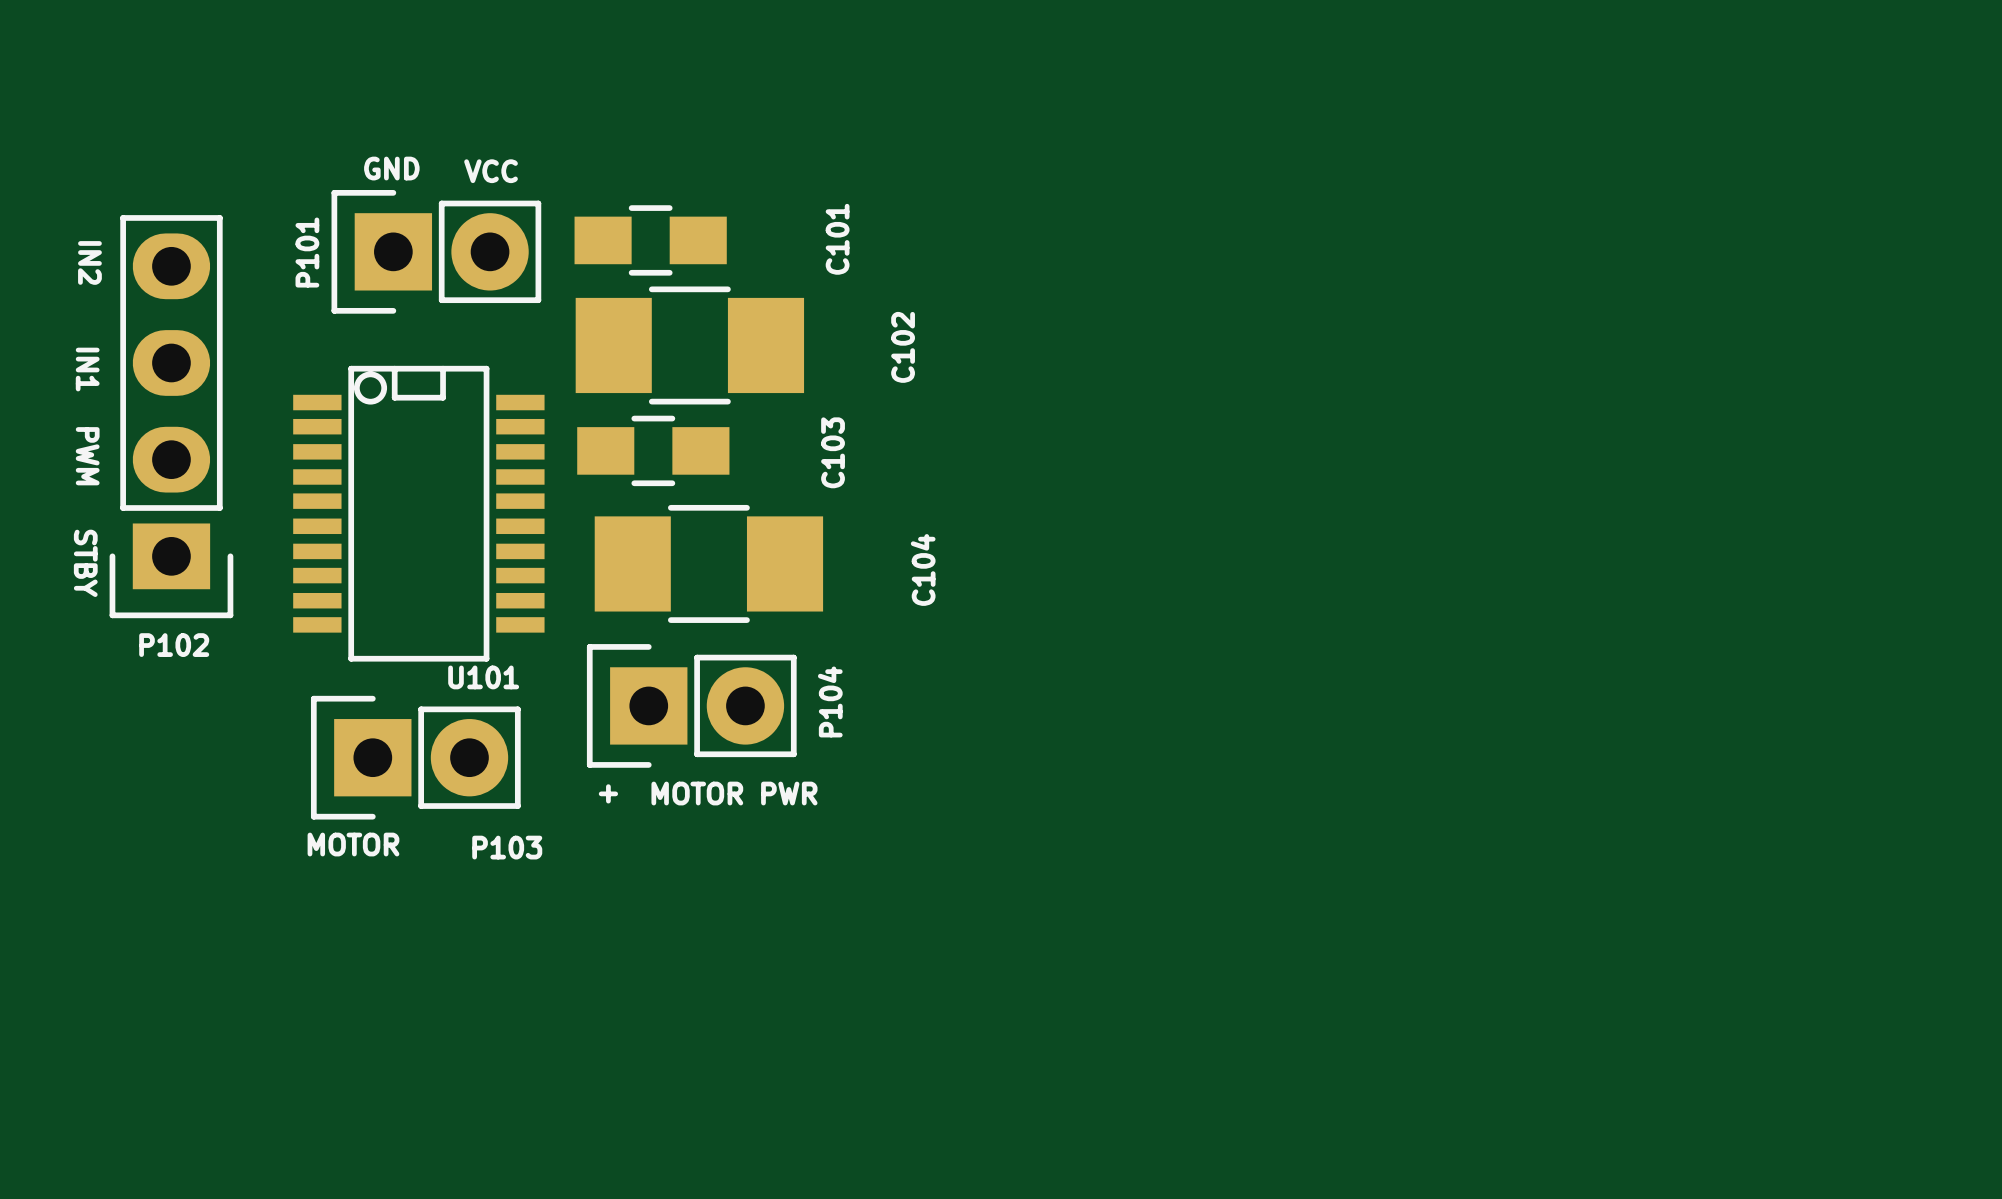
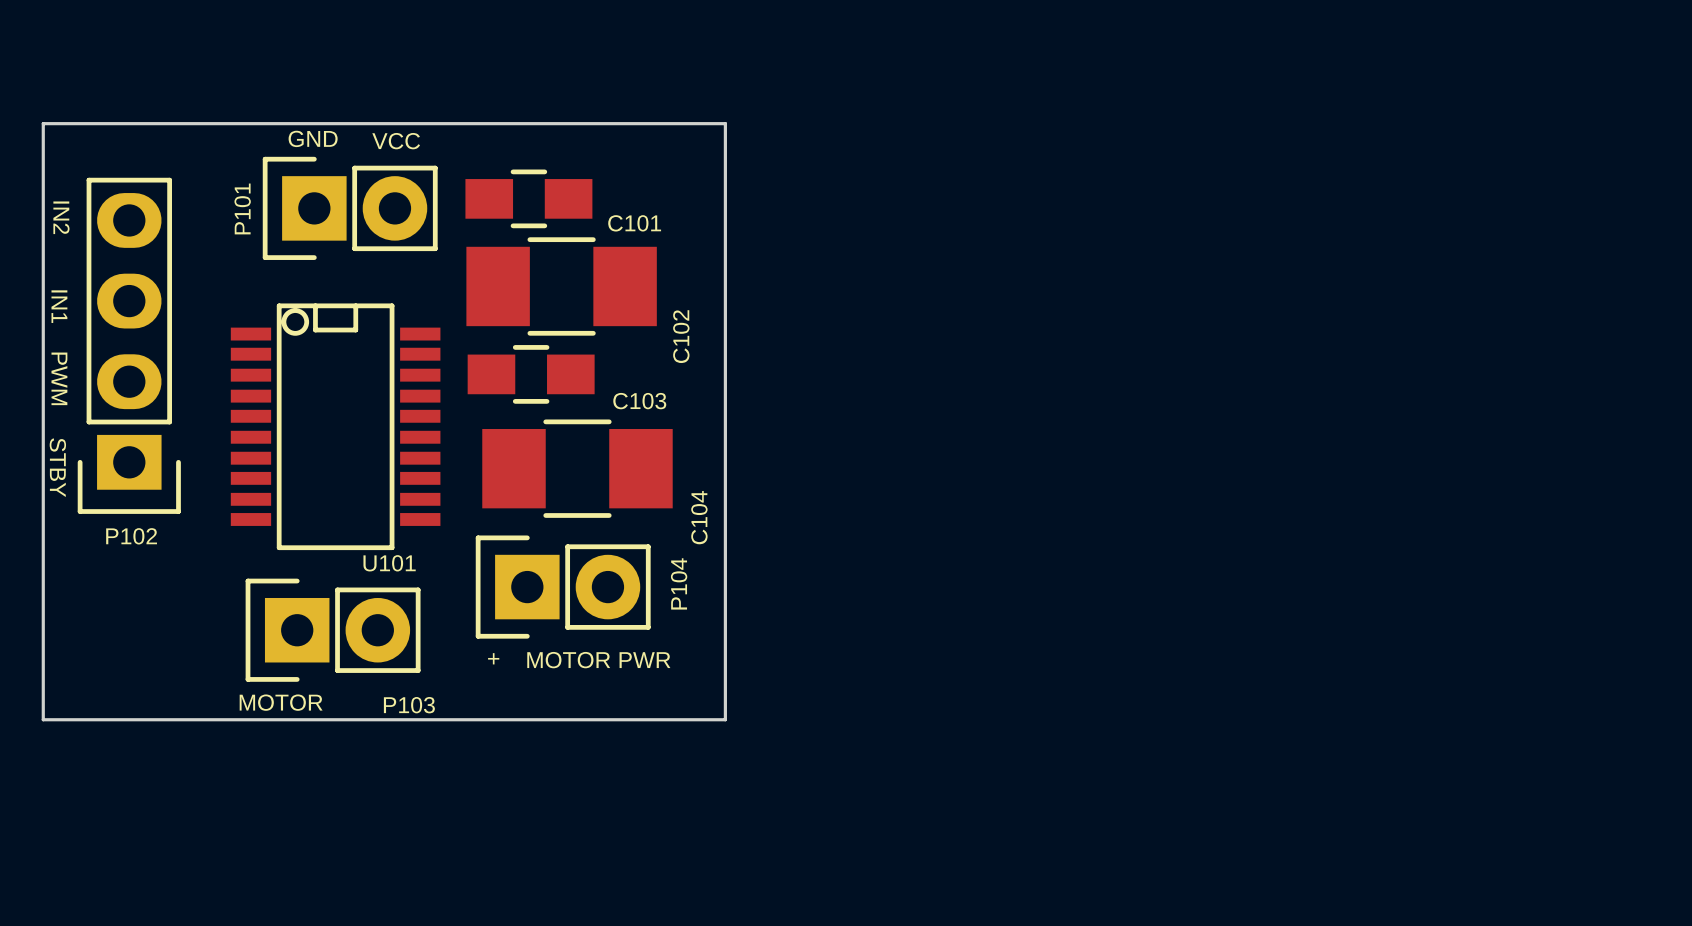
board edge: none -> (43, 123) (725, 123) (725, 719) (43, 719) (43, 123)
C101 name rotation: 0° (837, 239) -> 90° clockwise (634, 223)
C102 name position: C102 (903, 347) -> C102 (681, 336)
C103 name rotation: 0° (833, 452) -> 90° clockwise (639, 401)
C104 name position: C104 (923, 569) -> C104 (699, 517)

